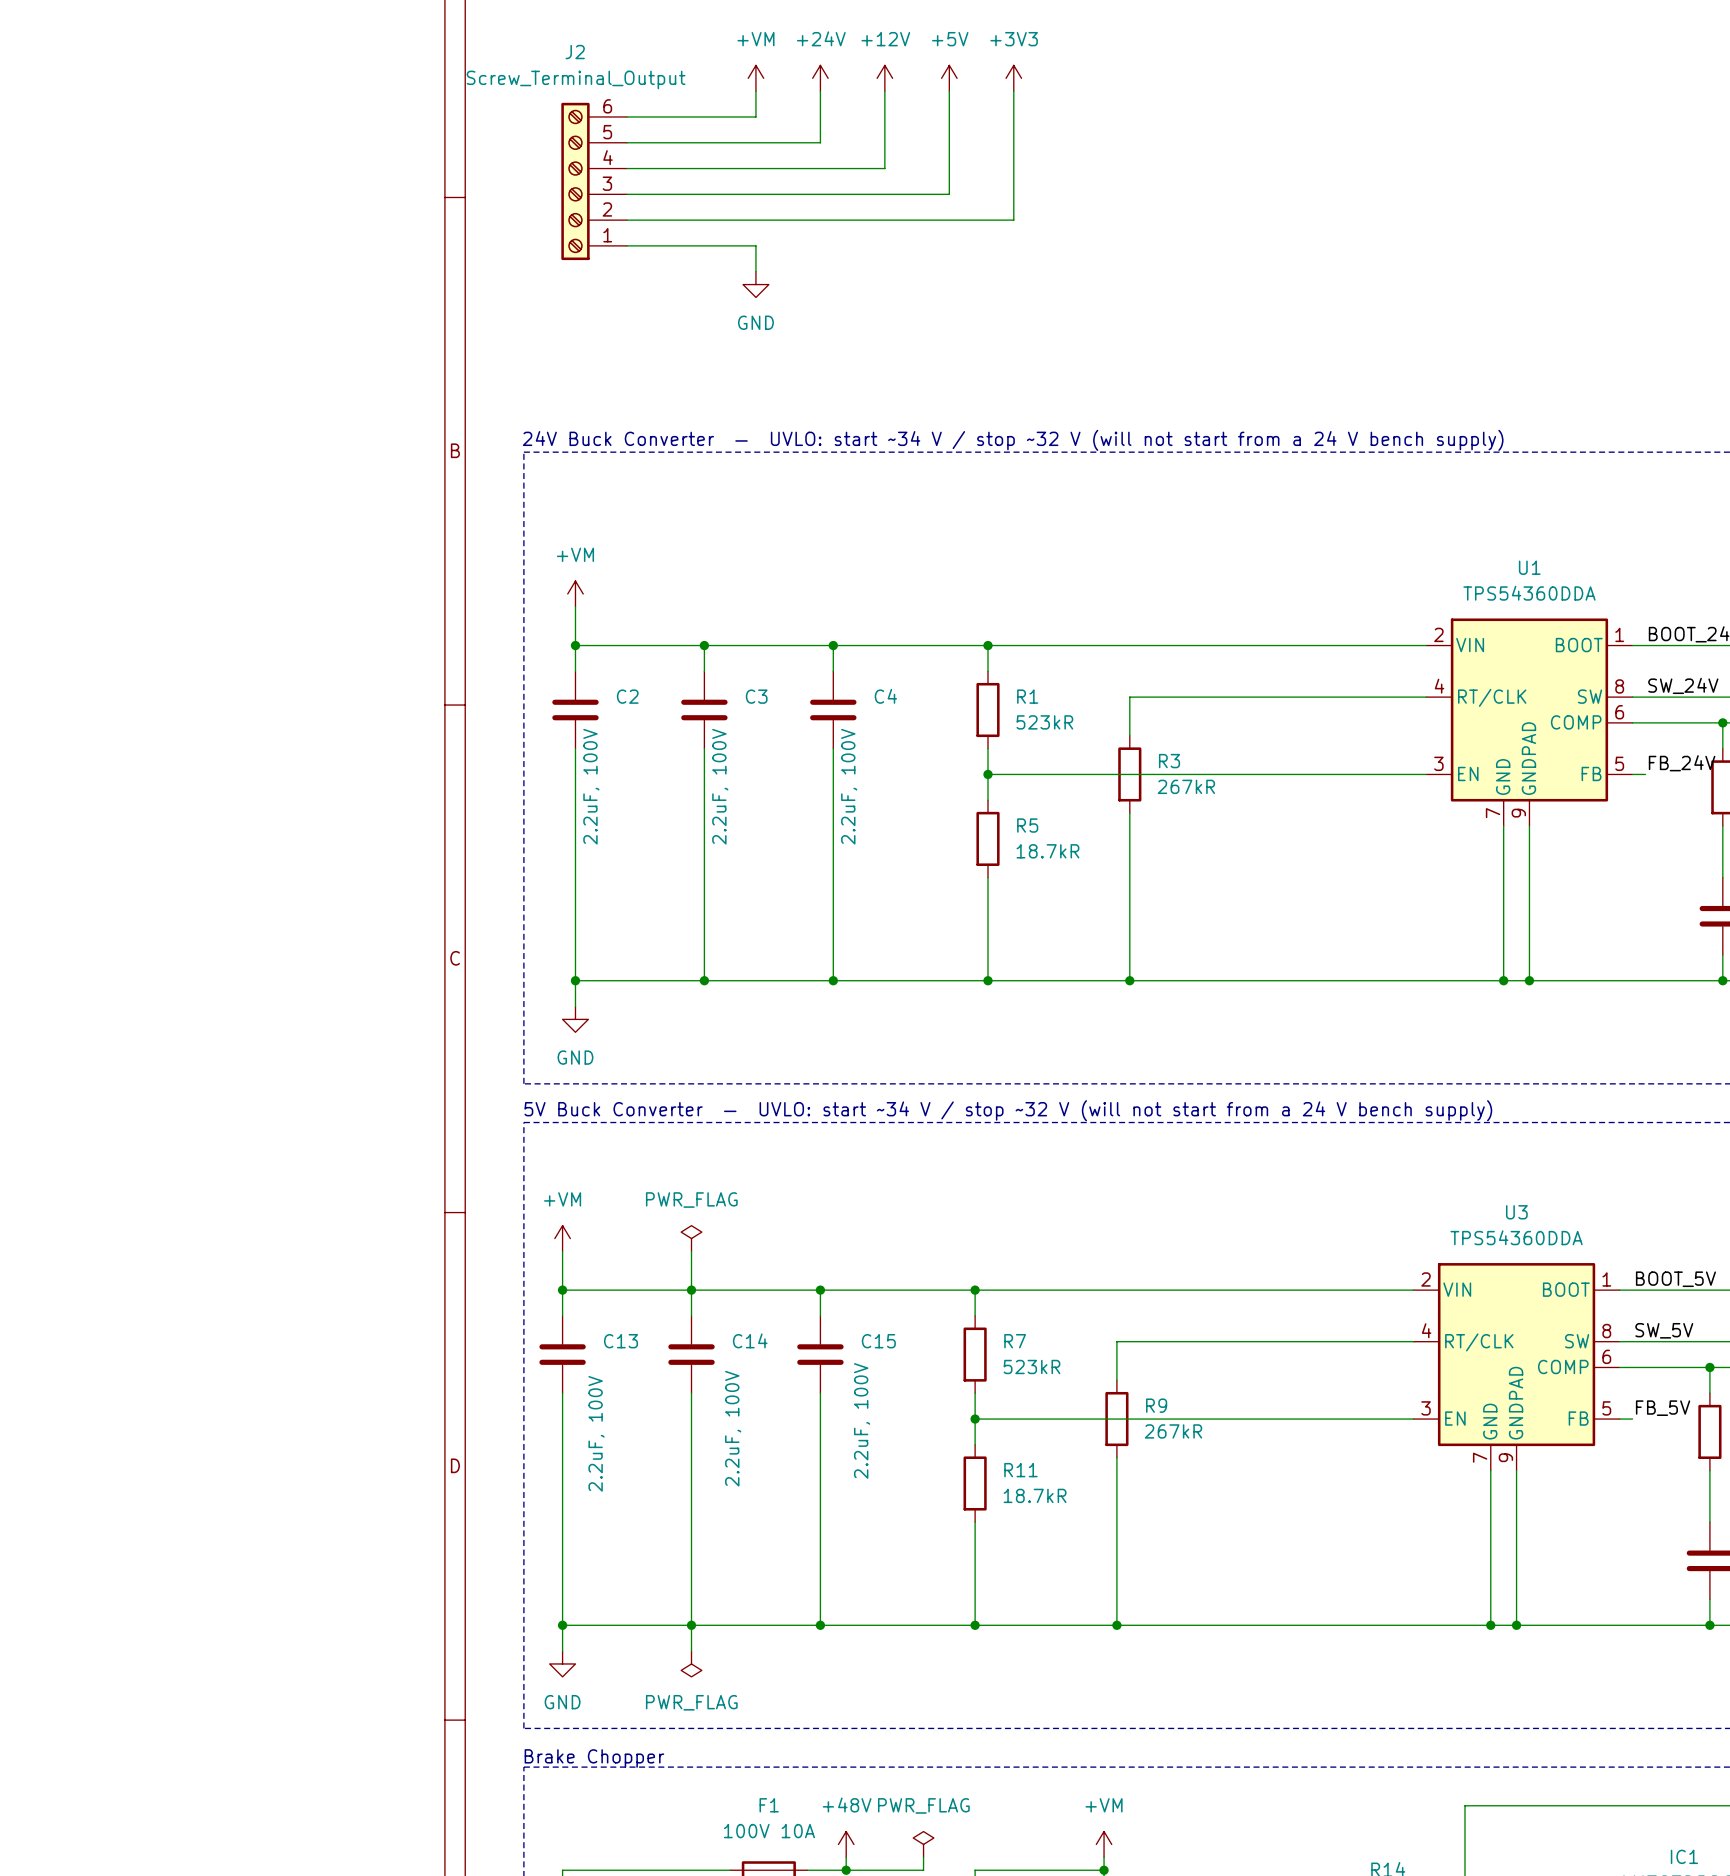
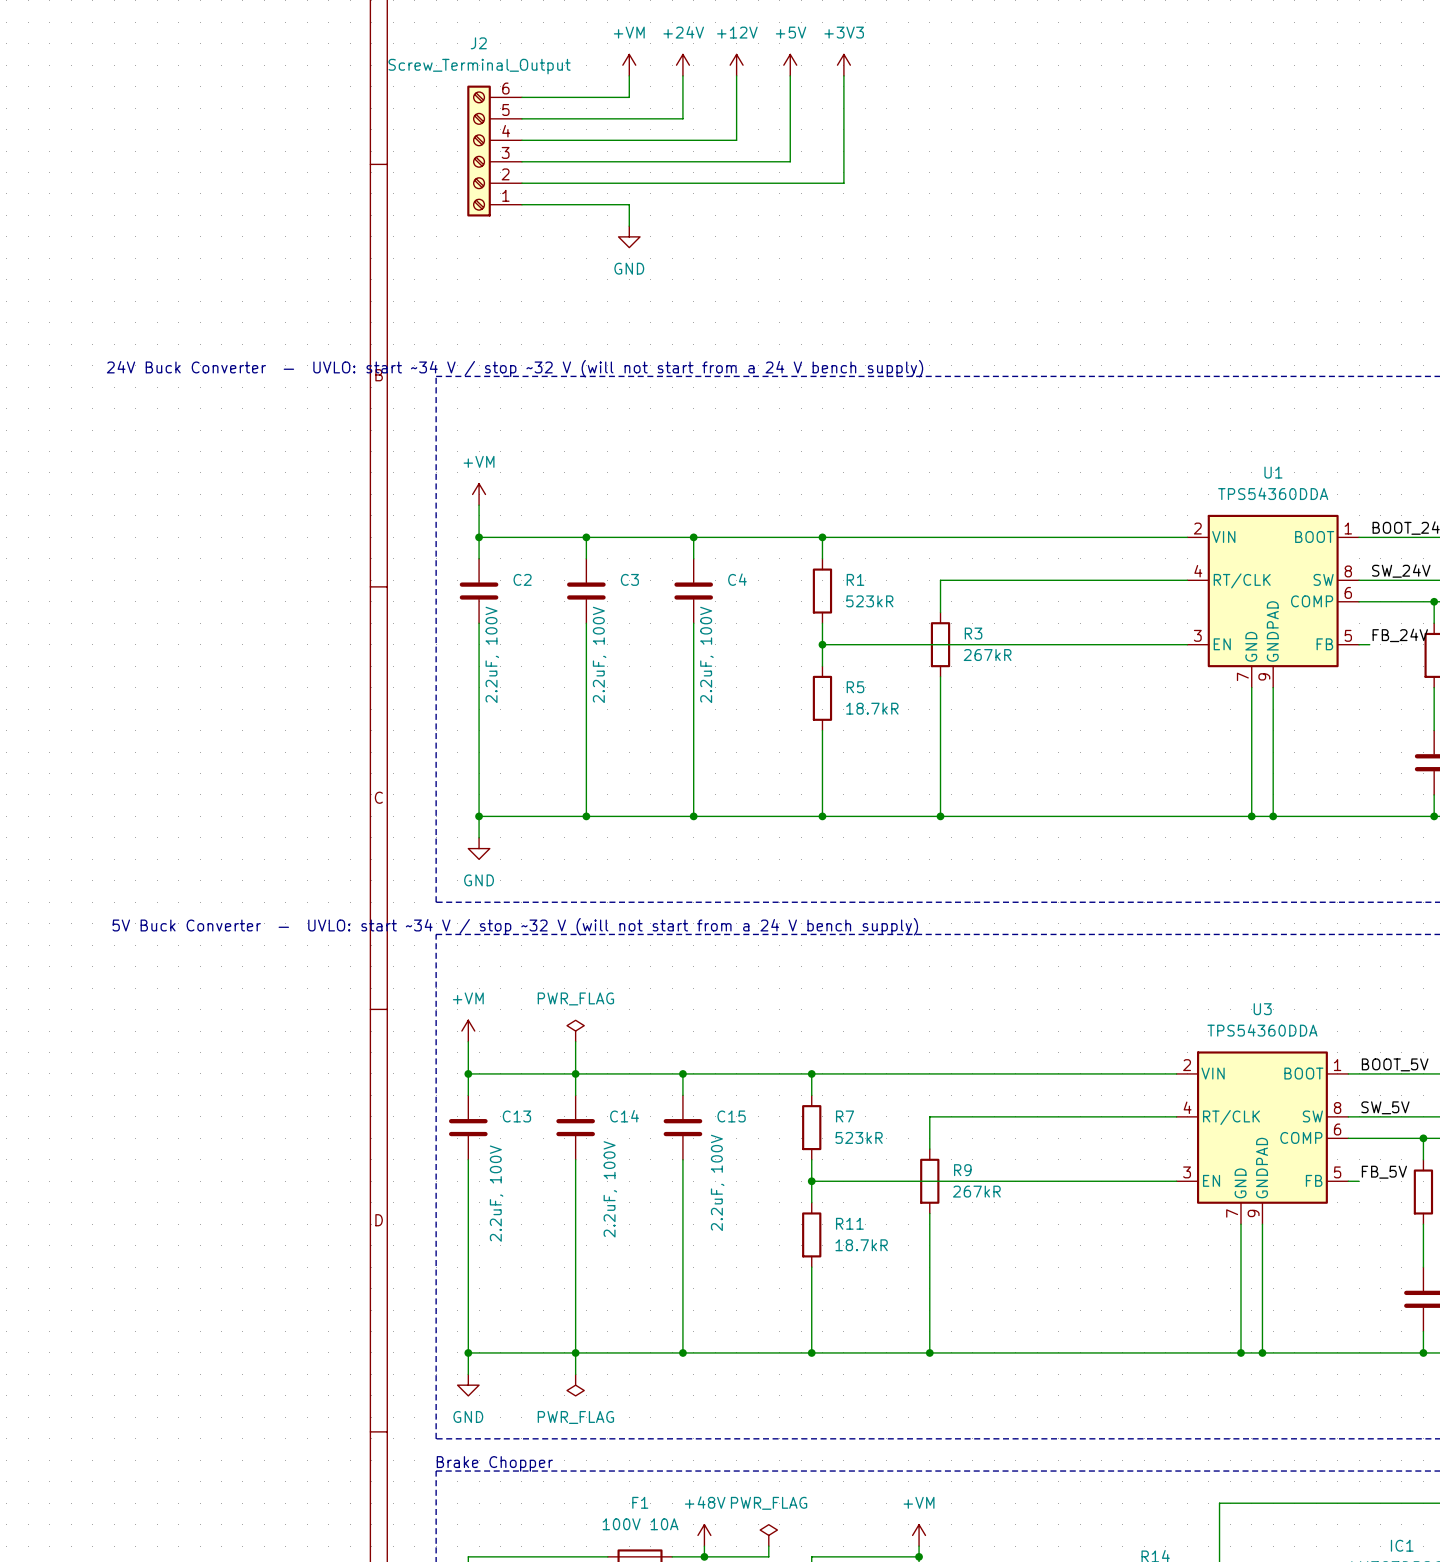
text: 24V Buck Converter — UVLO: start ~34 V / stop ~32 V (will not start from a 24 V bench supply) (1013, 440) -> none
text: none -> 24V Buck Converter — UVLO: start ~34 V / stop ~32 V (will not start from a 24 V bench supply) (515, 368)
text: 5V Buck Converter — UVLO: start ~34 V / stop ~32 V (will not start from a 24 V bench supply) (1008, 1110) -> none
text: none -> 5V Buck Converter — UVLO: start ~34 V / stop ~32 V (will not start from a 24 V bench supply) (515, 926)

